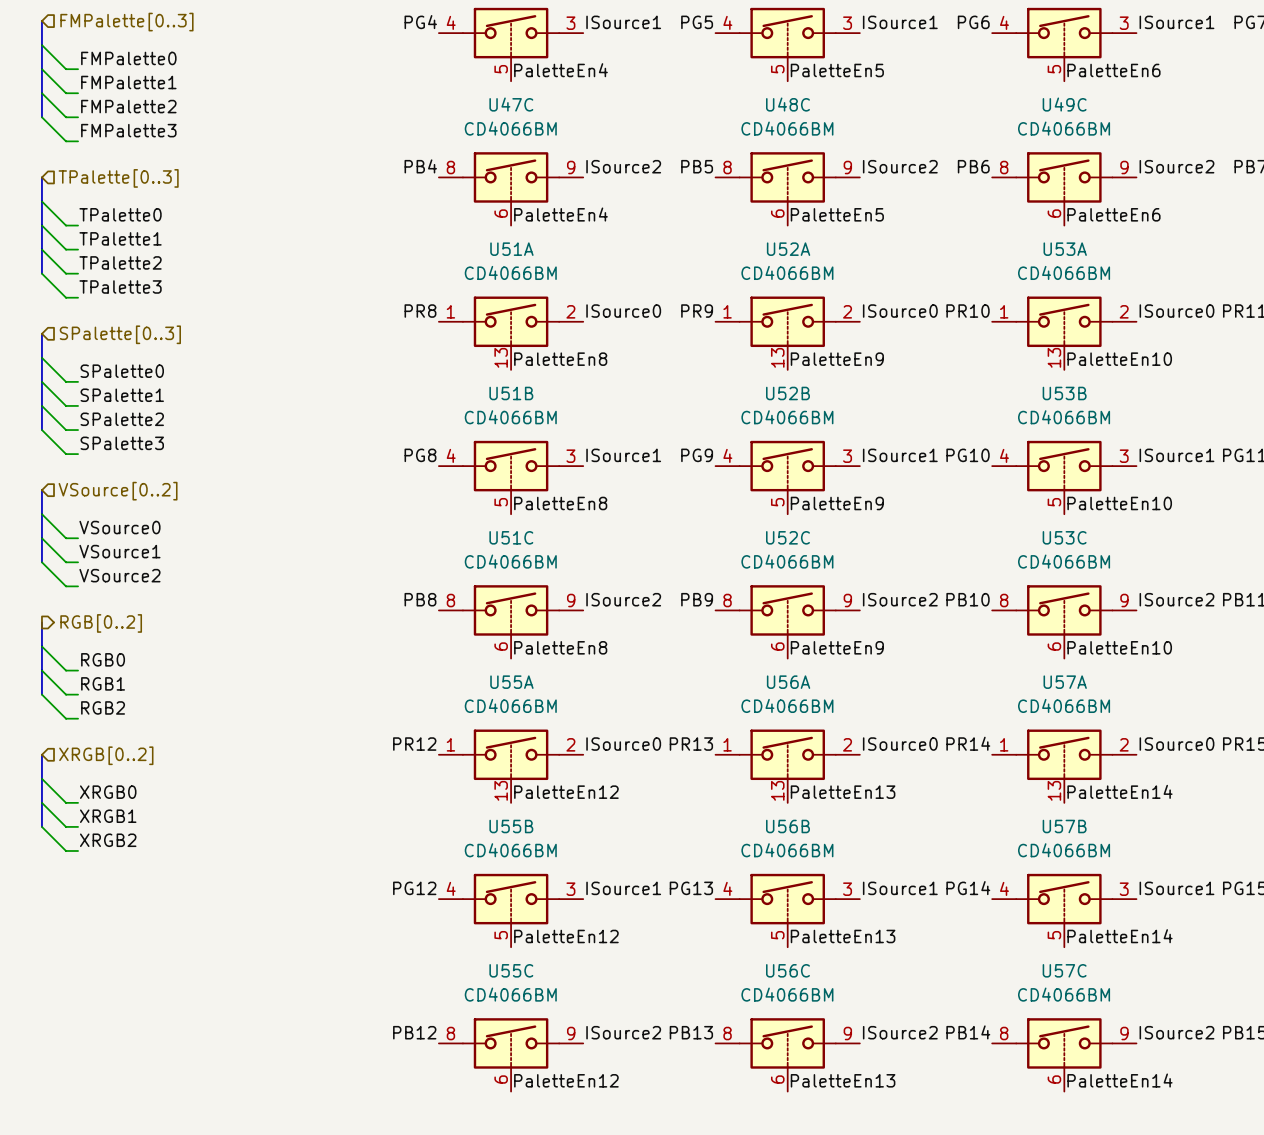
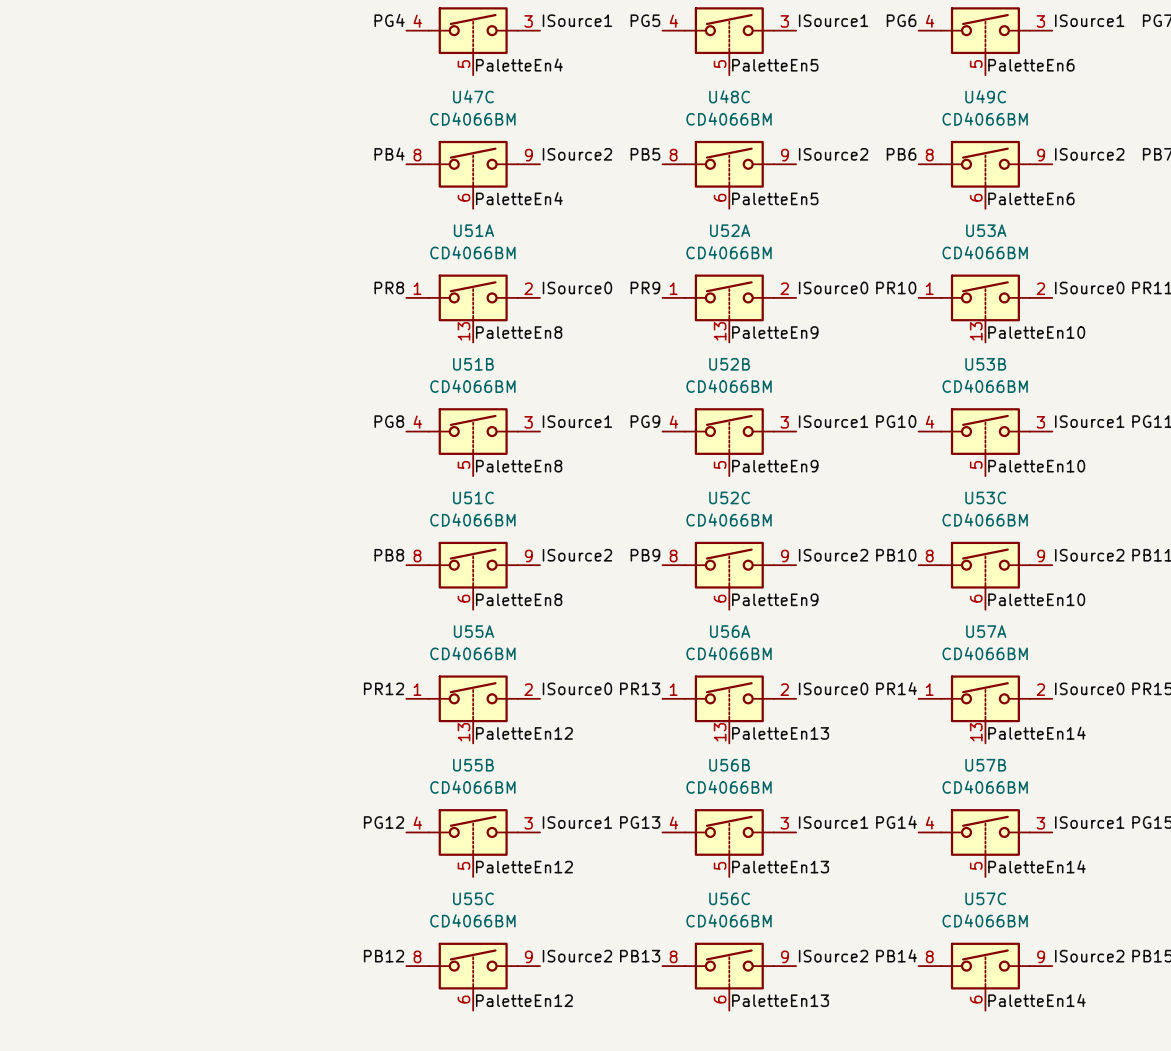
bus: (41, 21) (41, 117) -> none
hierarchical label: FMPalette[0..3] (126, 22) -> none
wire: (41, 45) (66, 69) (78, 69) -> none
label: FMPalette0 (128, 58) -> none
wire: (41, 69) (66, 93) (78, 93) -> none
label: FMPalette1 (128, 82) -> none
wire: (41, 93) (66, 117) (78, 117) -> none
label: FMPalette2 (128, 106) -> none
wire: (41, 117) (66, 141) (78, 141) -> none
label: FMPalette3 (128, 130) -> none
bus: (41, 177) (41, 273) -> none
hierarchical label: TPalette[0..3] (118, 178) -> none
wire: (41, 201) (66, 225) (78, 225) -> none
label: TPalette0 (120, 214) -> none
wire: (41, 225) (66, 249) (78, 249) -> none
label: TPalette1 (120, 238) -> none
wire: (41, 249) (66, 273) (78, 273) -> none
label: TPalette2 (120, 262) -> none
wire: (41, 273) (66, 297) (78, 297) -> none
label: TPalette3 (120, 286) -> none
bus: (41, 333) (41, 430) -> none
hierarchical label: SPalette[0..3] (120, 334) -> none
wire: (41, 357) (66, 381) (78, 381) -> none
label: SPalette0 (122, 371) -> none
wire: (41, 381) (66, 405) (78, 405) -> none
label: SPalette1 (122, 395) -> none
wire: (41, 405) (66, 430) (78, 430) -> none
label: SPalette2 (122, 419) -> none
wire: (41, 430) (66, 454) (78, 454) -> none
label: SPalette3 (122, 443) -> none
bus: (41, 490) (41, 562) -> none
hierarchical label: VSource[0..2] (118, 491) -> none
wire: (41, 514) (66, 538) (78, 538) -> none
label: VSource0 (119, 527) -> none
wire: (41, 538) (66, 562) (78, 562) -> none
label: VSource1 (119, 551) -> none
wire: (41, 562) (66, 586) (78, 586) -> none
label: VSource2 (119, 575) -> none
bus: (41, 622) (41, 694) -> none
hierarchical label: RGB[0..2] (101, 623) -> none
wire: (41, 646) (66, 670) (78, 670) -> none
label: RGB0 (103, 659) -> none
wire: (41, 670) (66, 694) (78, 694) -> none
label: RGB1 (103, 683) -> none
wire: (41, 694) (66, 718) (78, 718) -> none
label: RGB2 (103, 707) -> none
bus: (41, 754) (41, 826) -> none
hierarchical label: XRGB[0..2] (106, 755) -> none
wire: (41, 778) (66, 802) (78, 802) -> none
label: XRGB0 (108, 792) -> none
wire: (41, 802) (66, 826) (78, 826) -> none
label: XRGB1 (108, 816) -> none
wire: (41, 826) (66, 850) (78, 850) -> none
label: XRGB2 (108, 840) -> none

